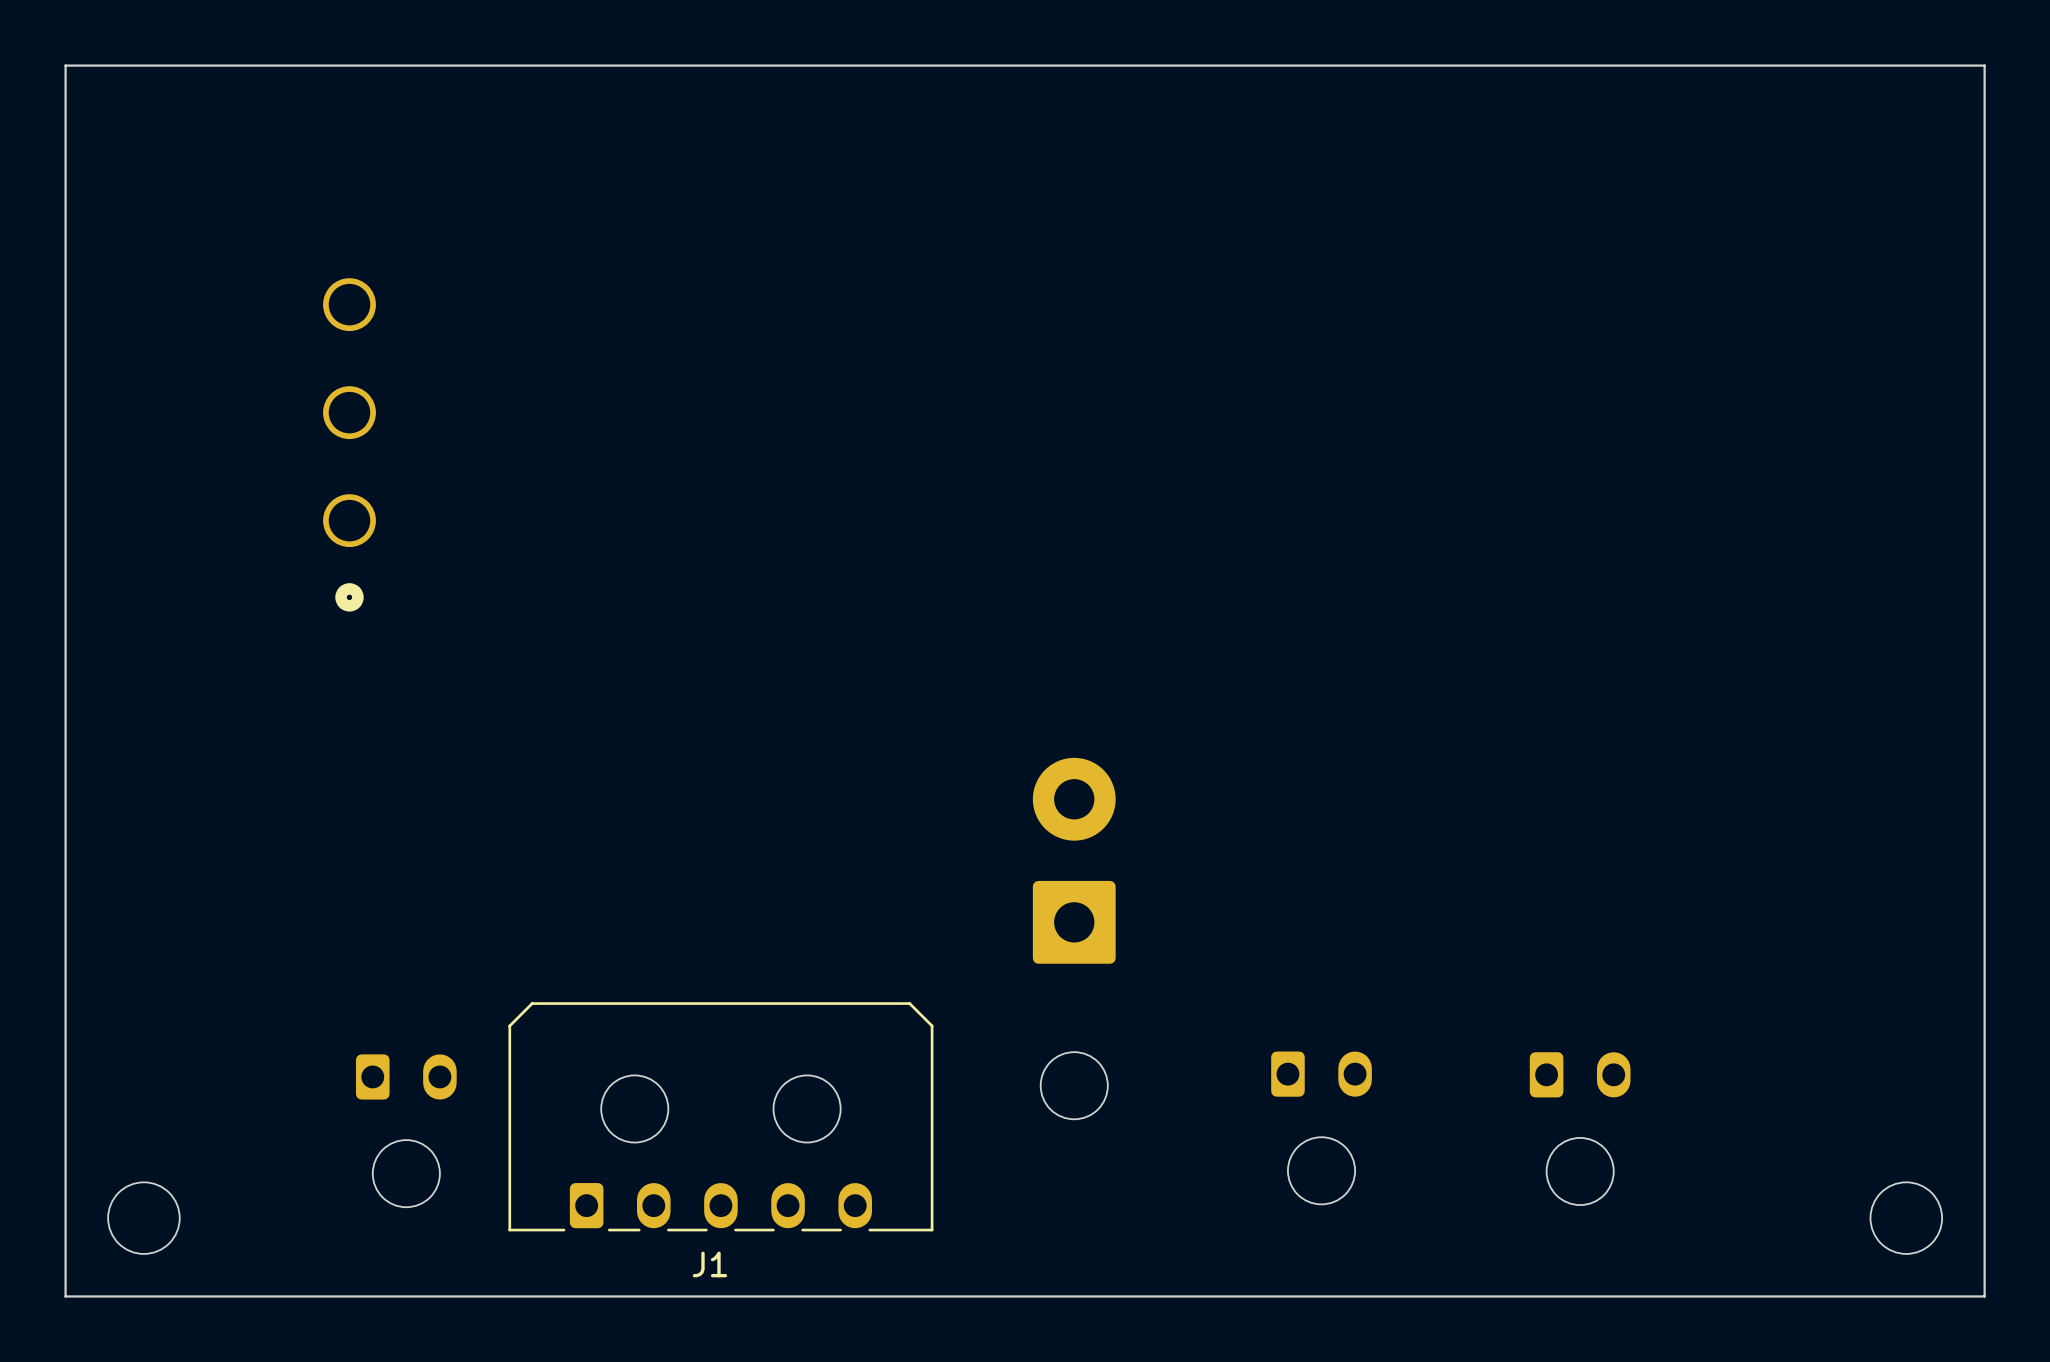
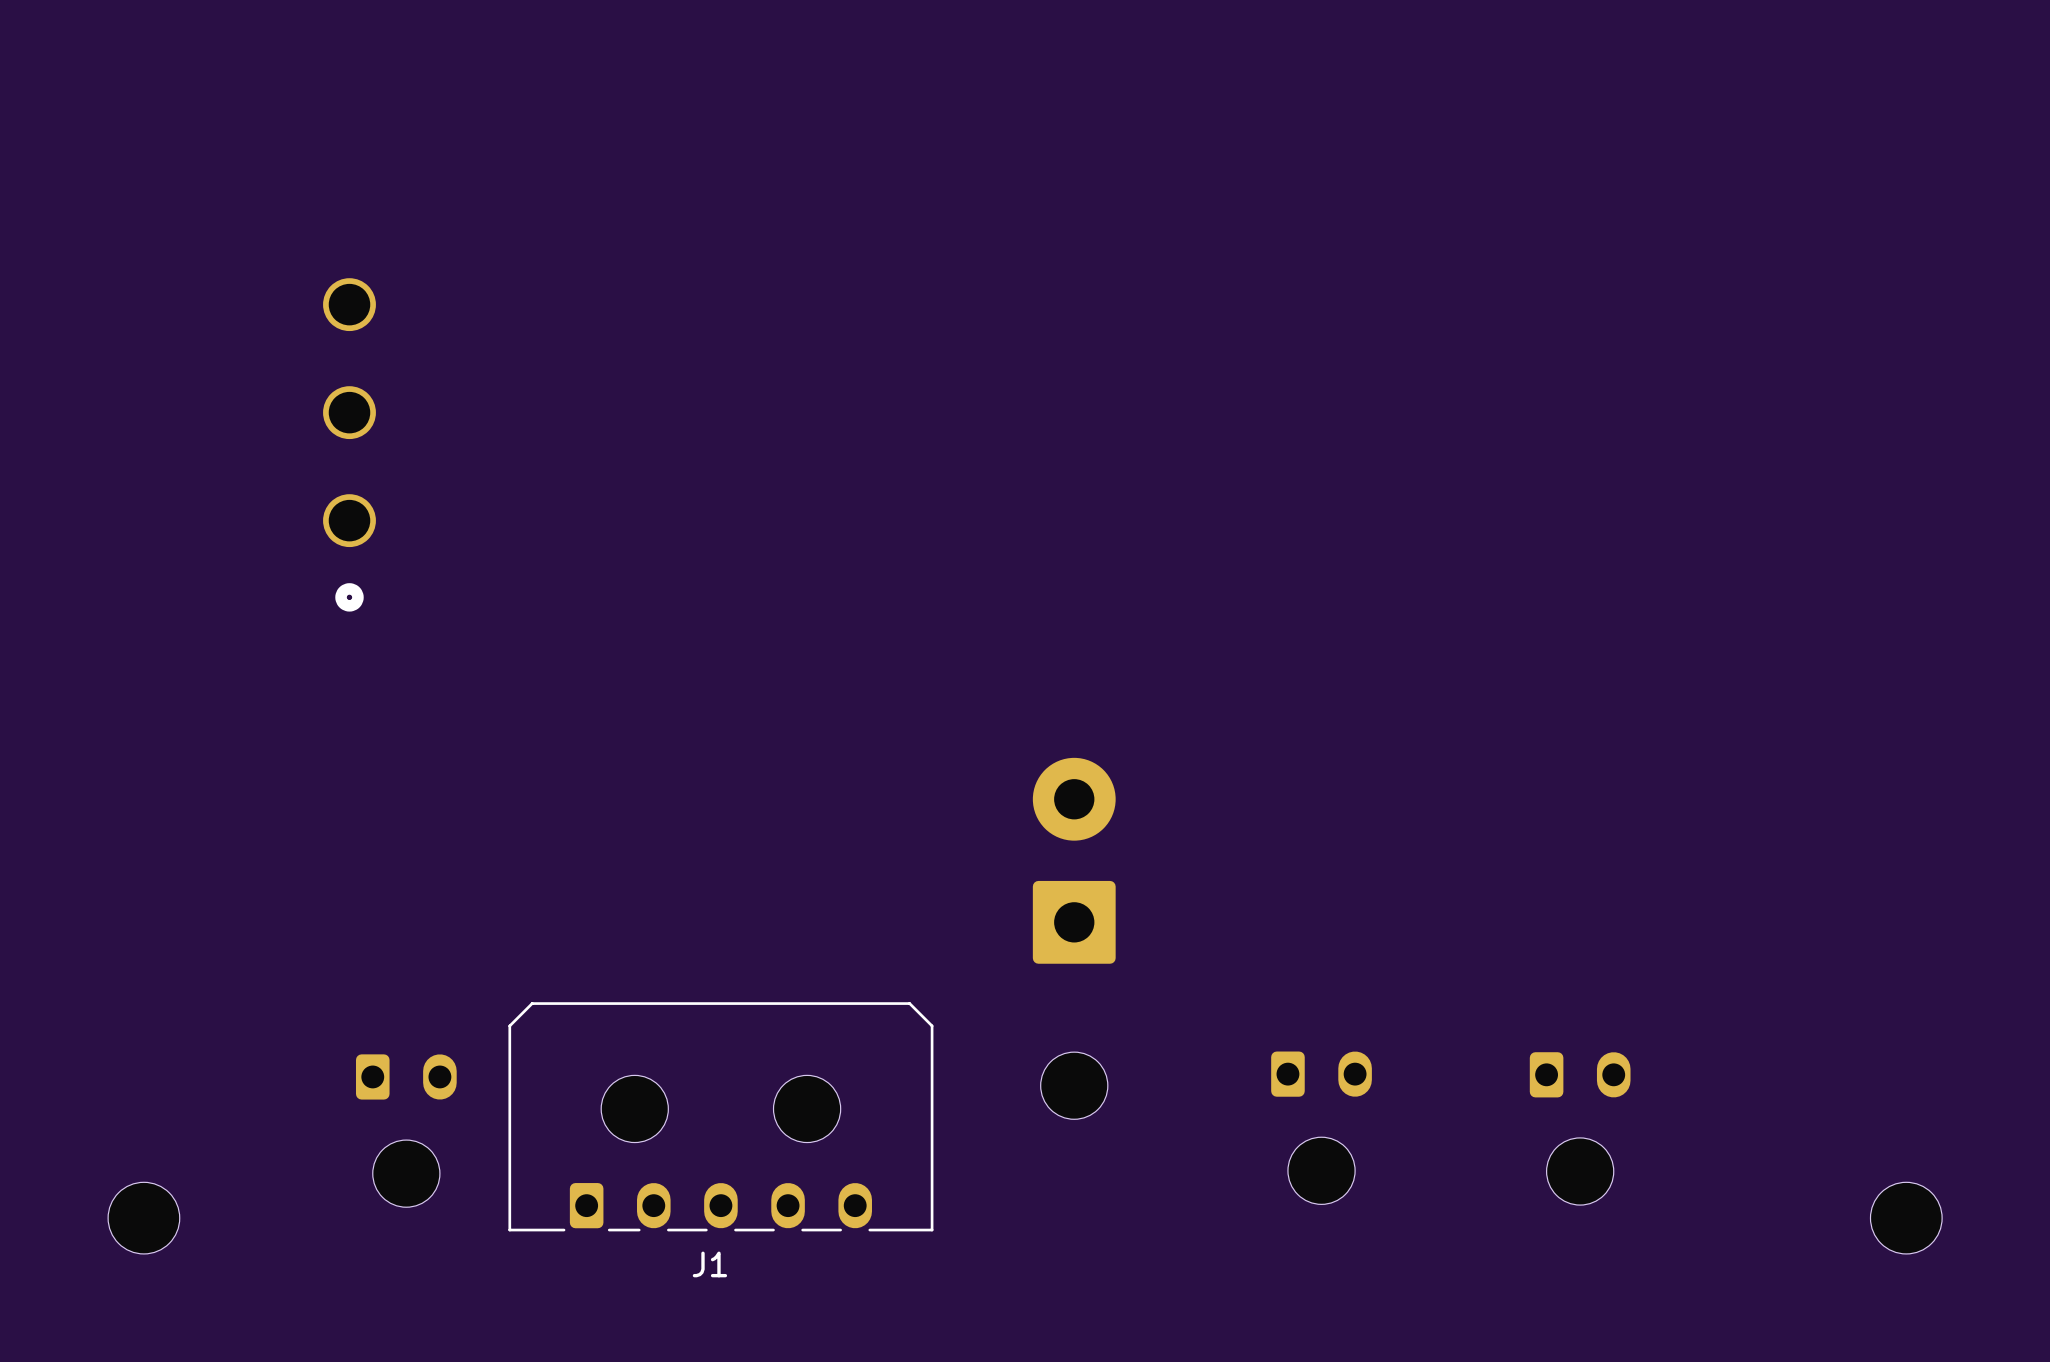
board edge: (1984, 65) (65, 65) (65, 1296) (1984, 1296) (1984, 65) -> none

